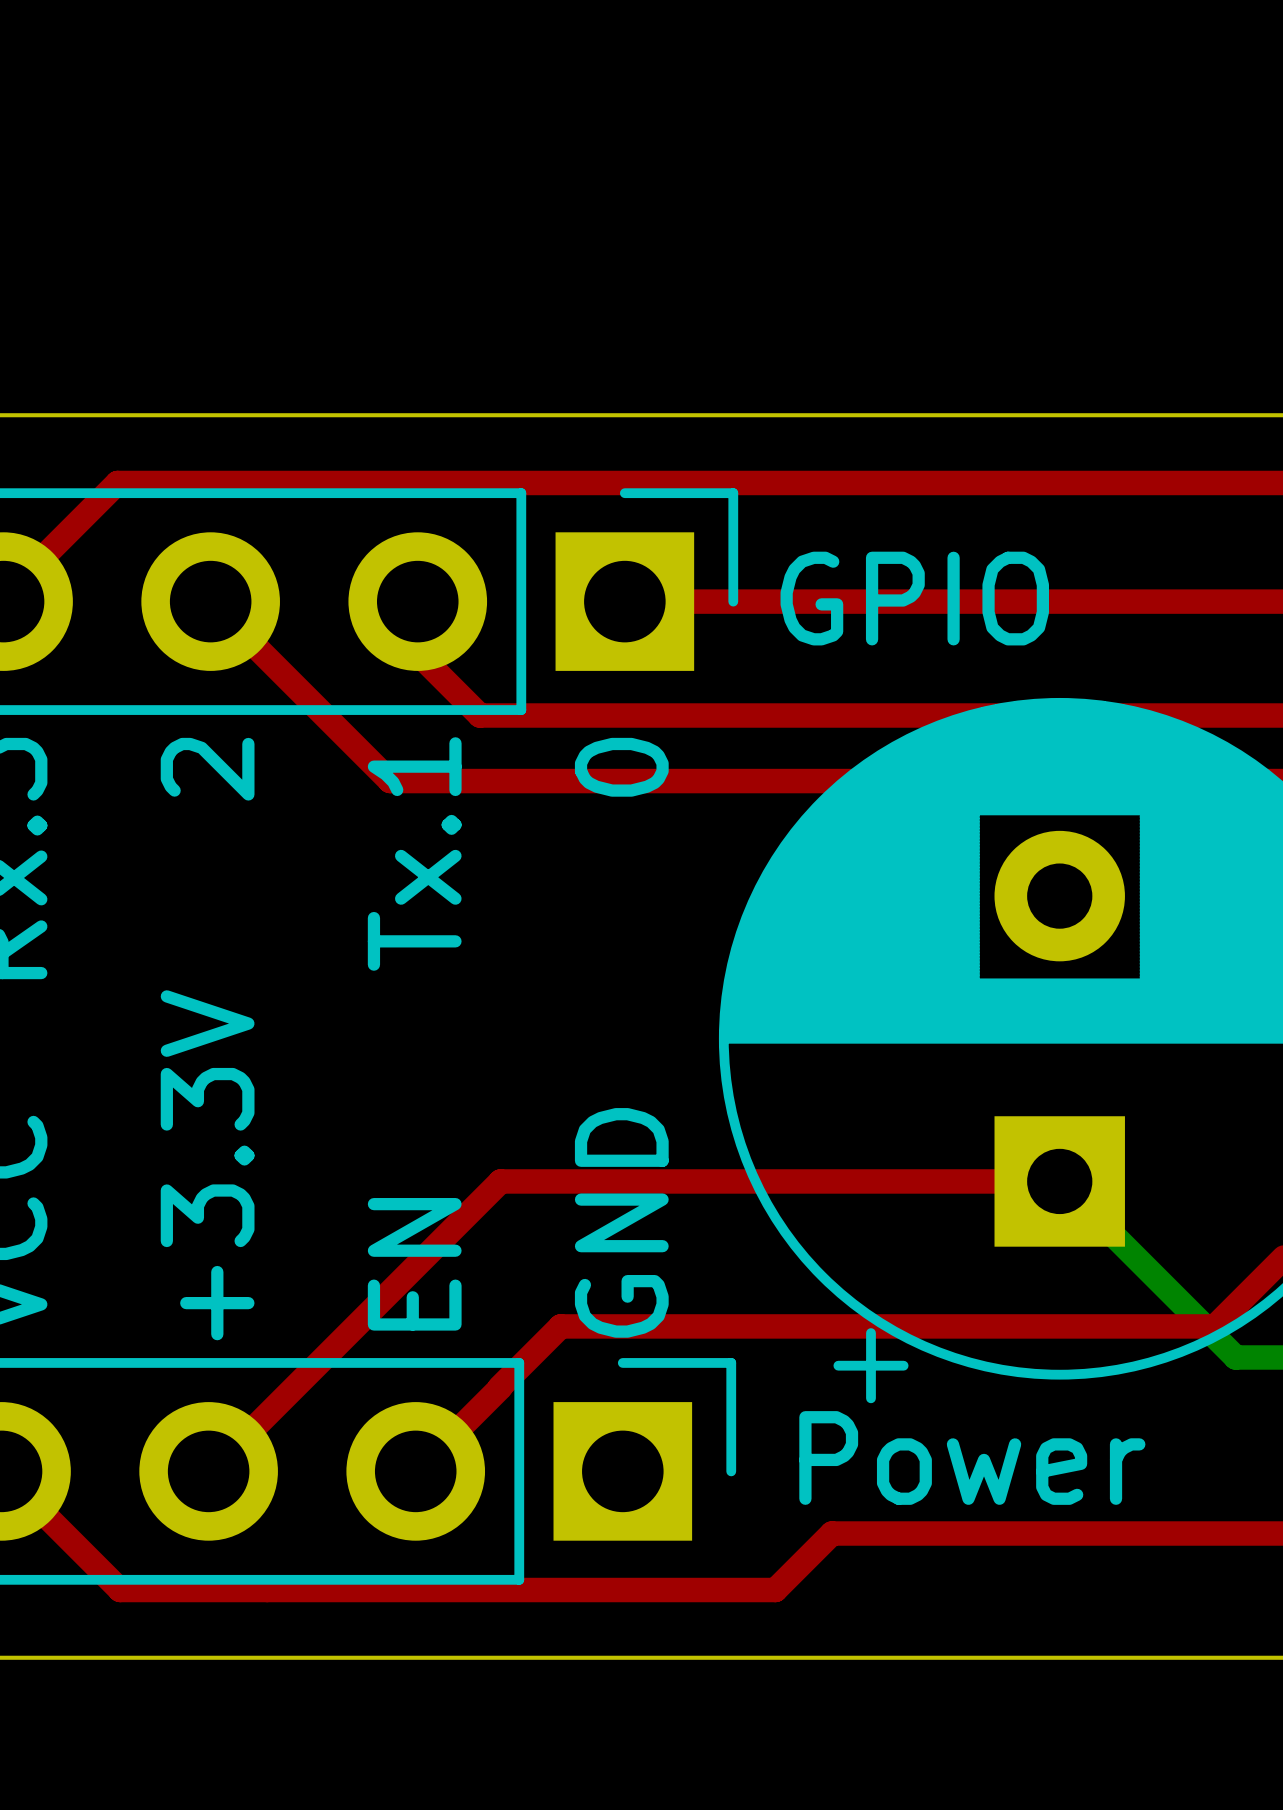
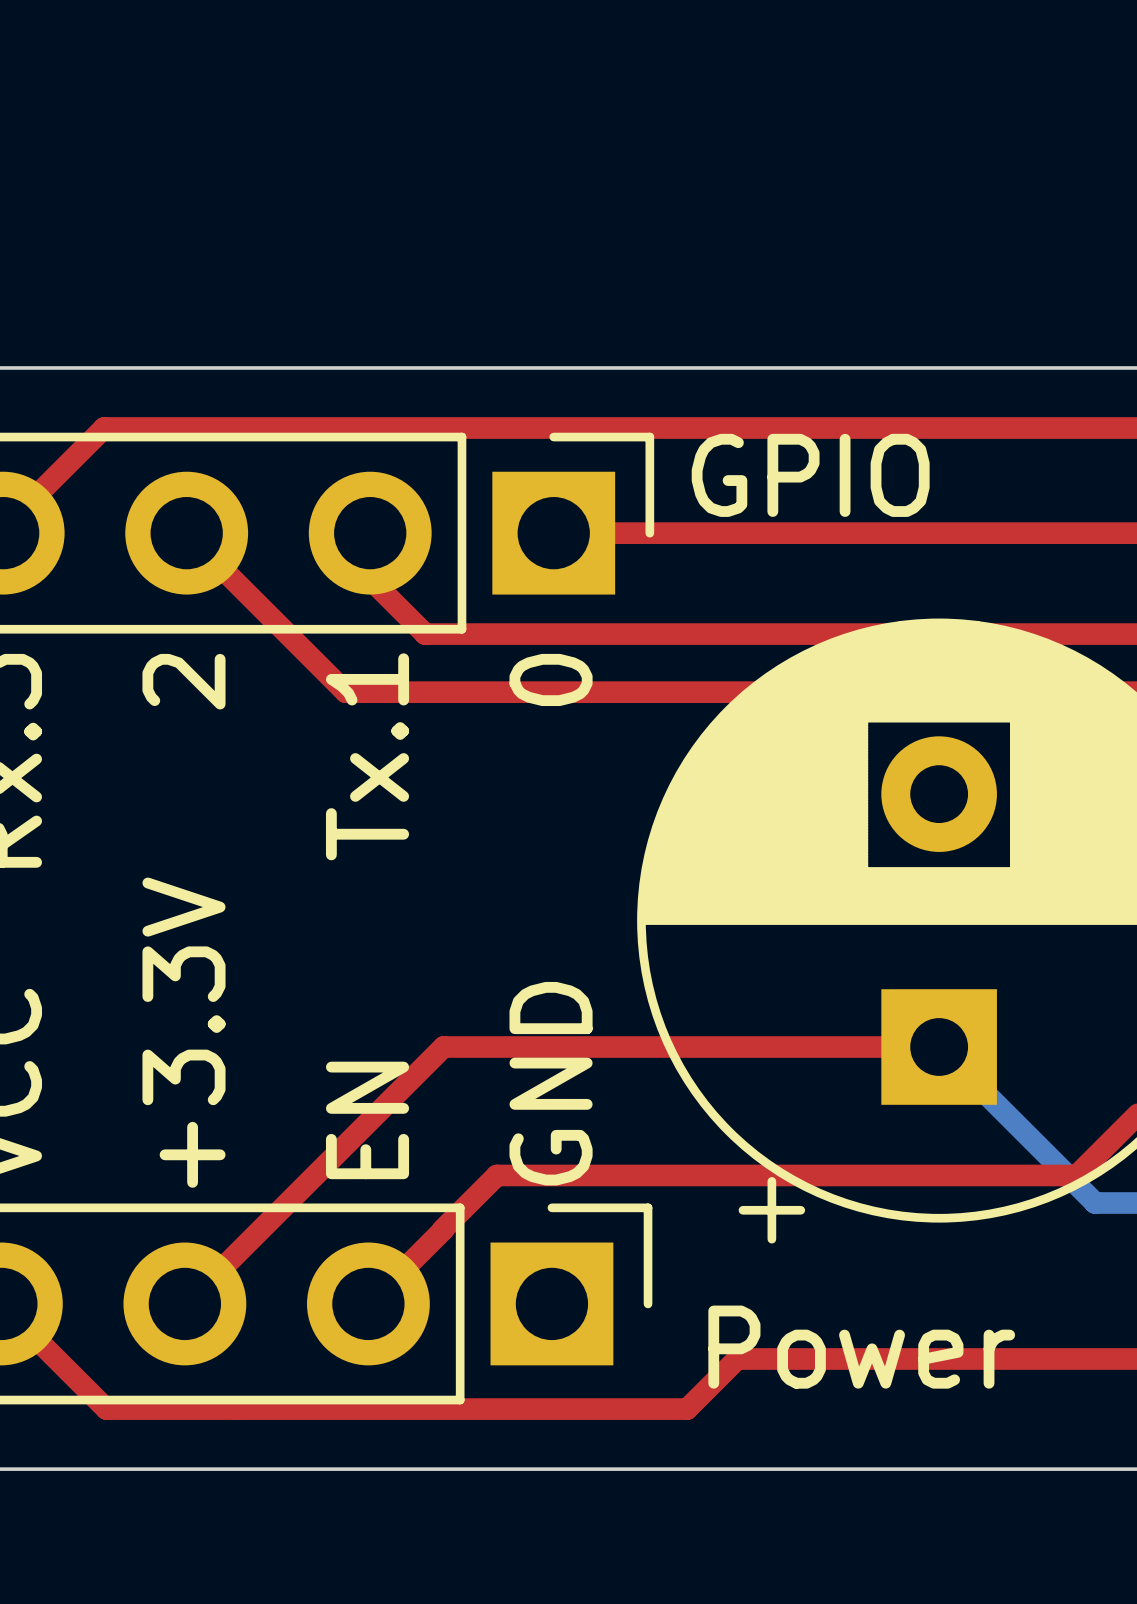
GPIO name position: GPIO (914, 598) -> GPIO (810, 475)
Power name position: Power (972, 1457) -> Power (861, 1347)

